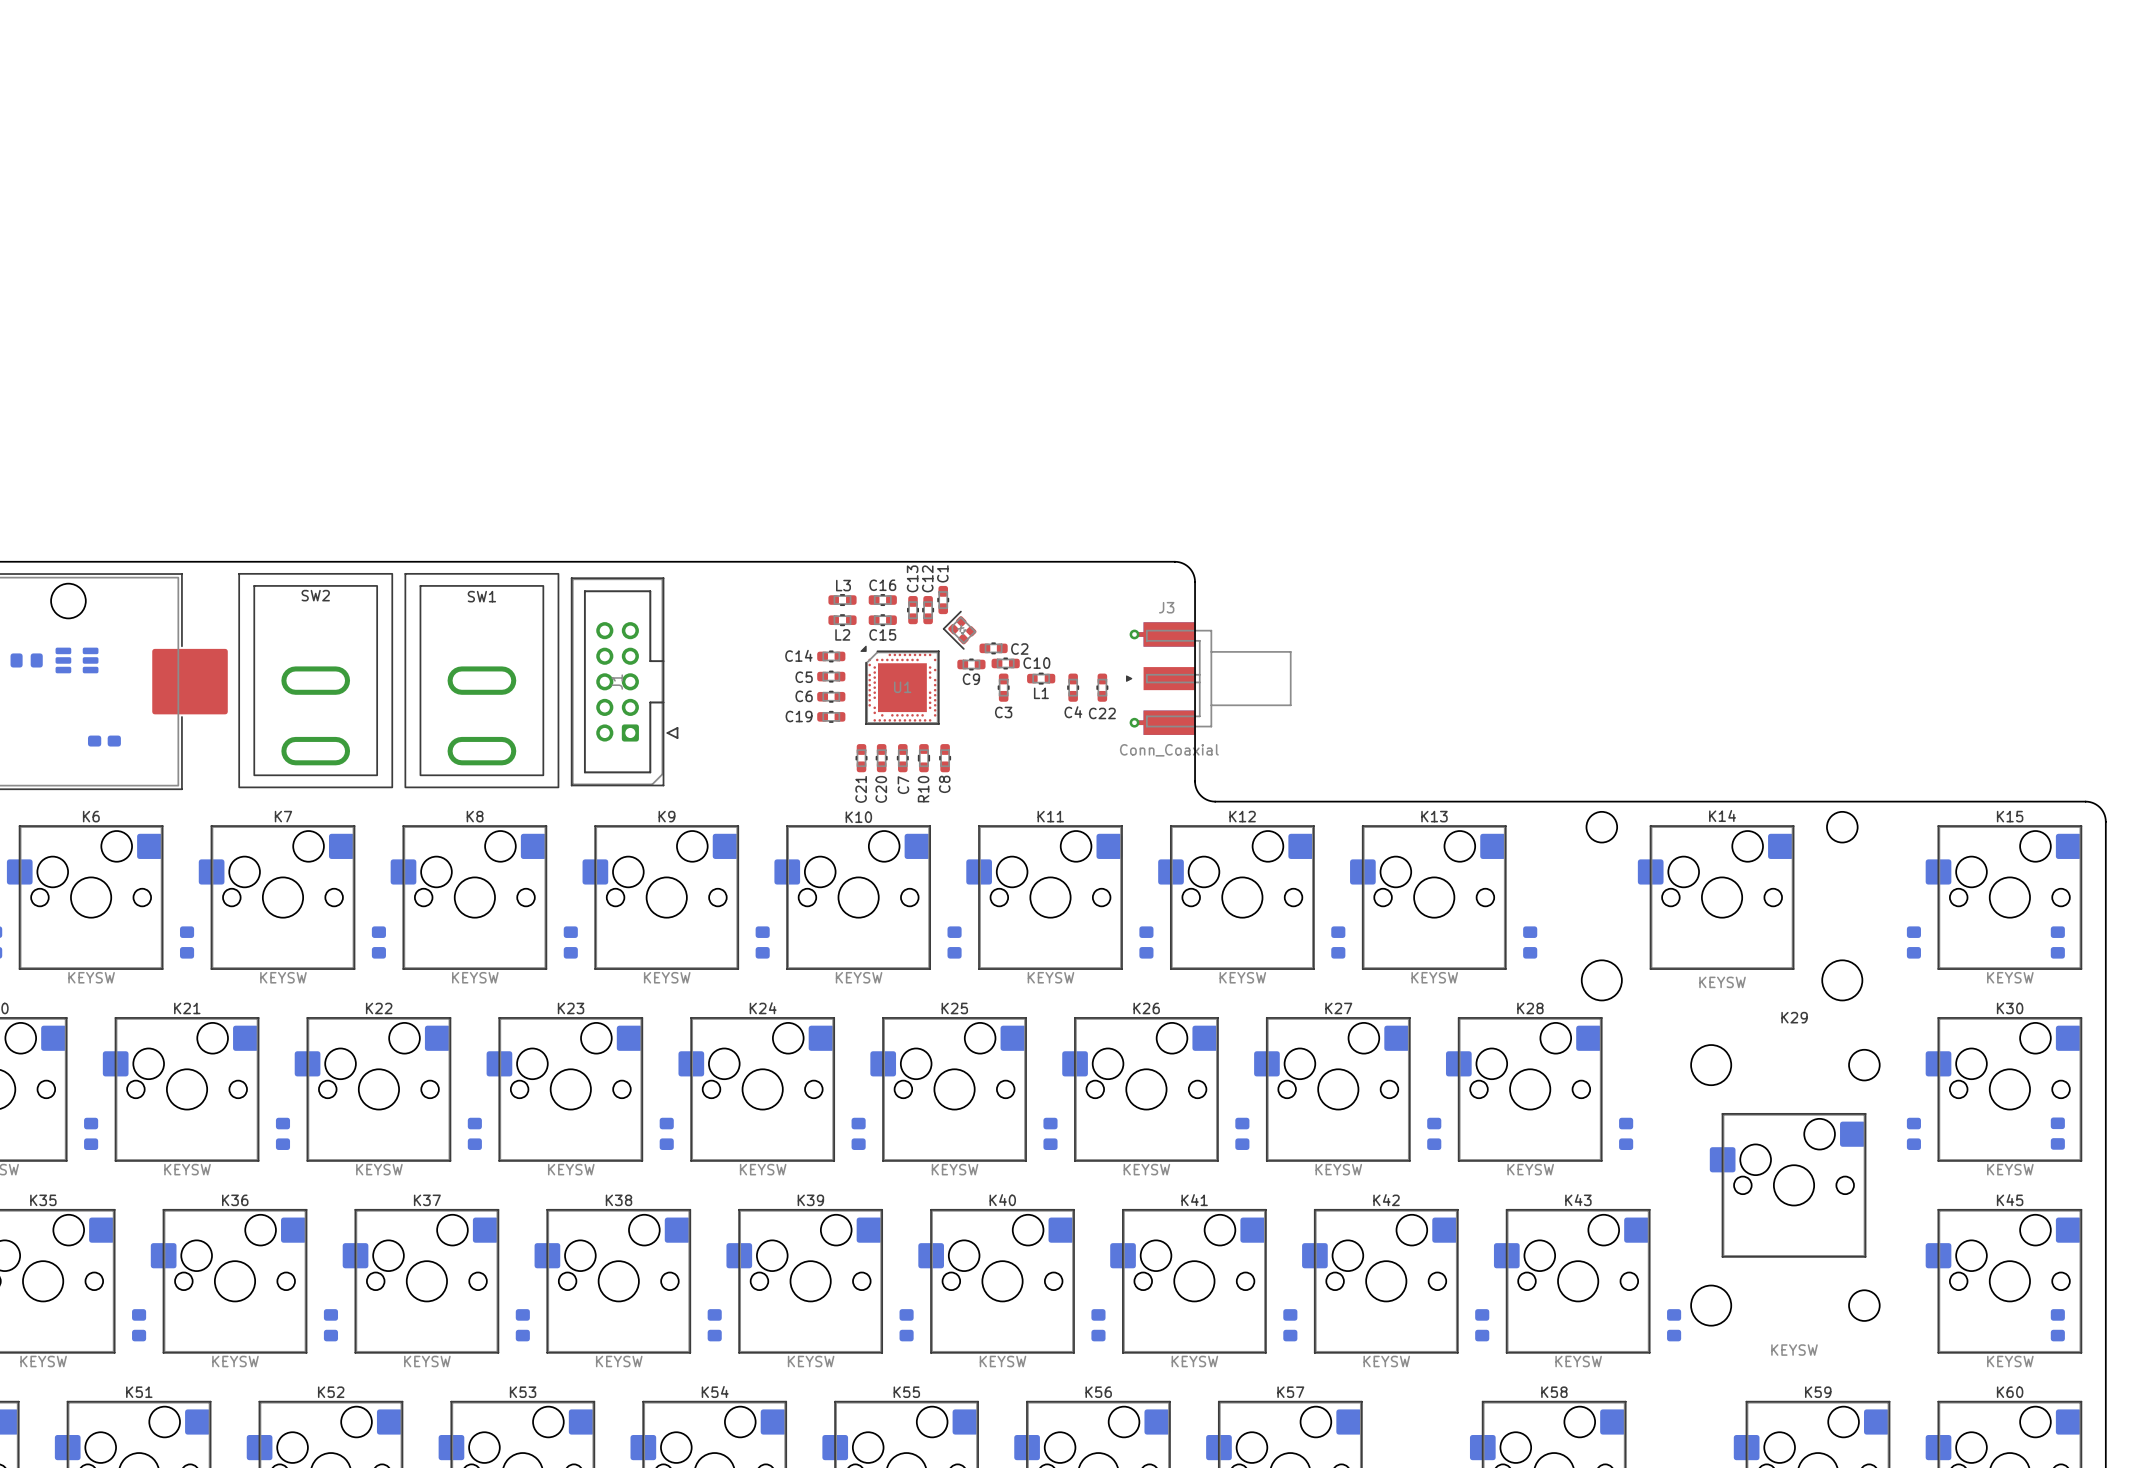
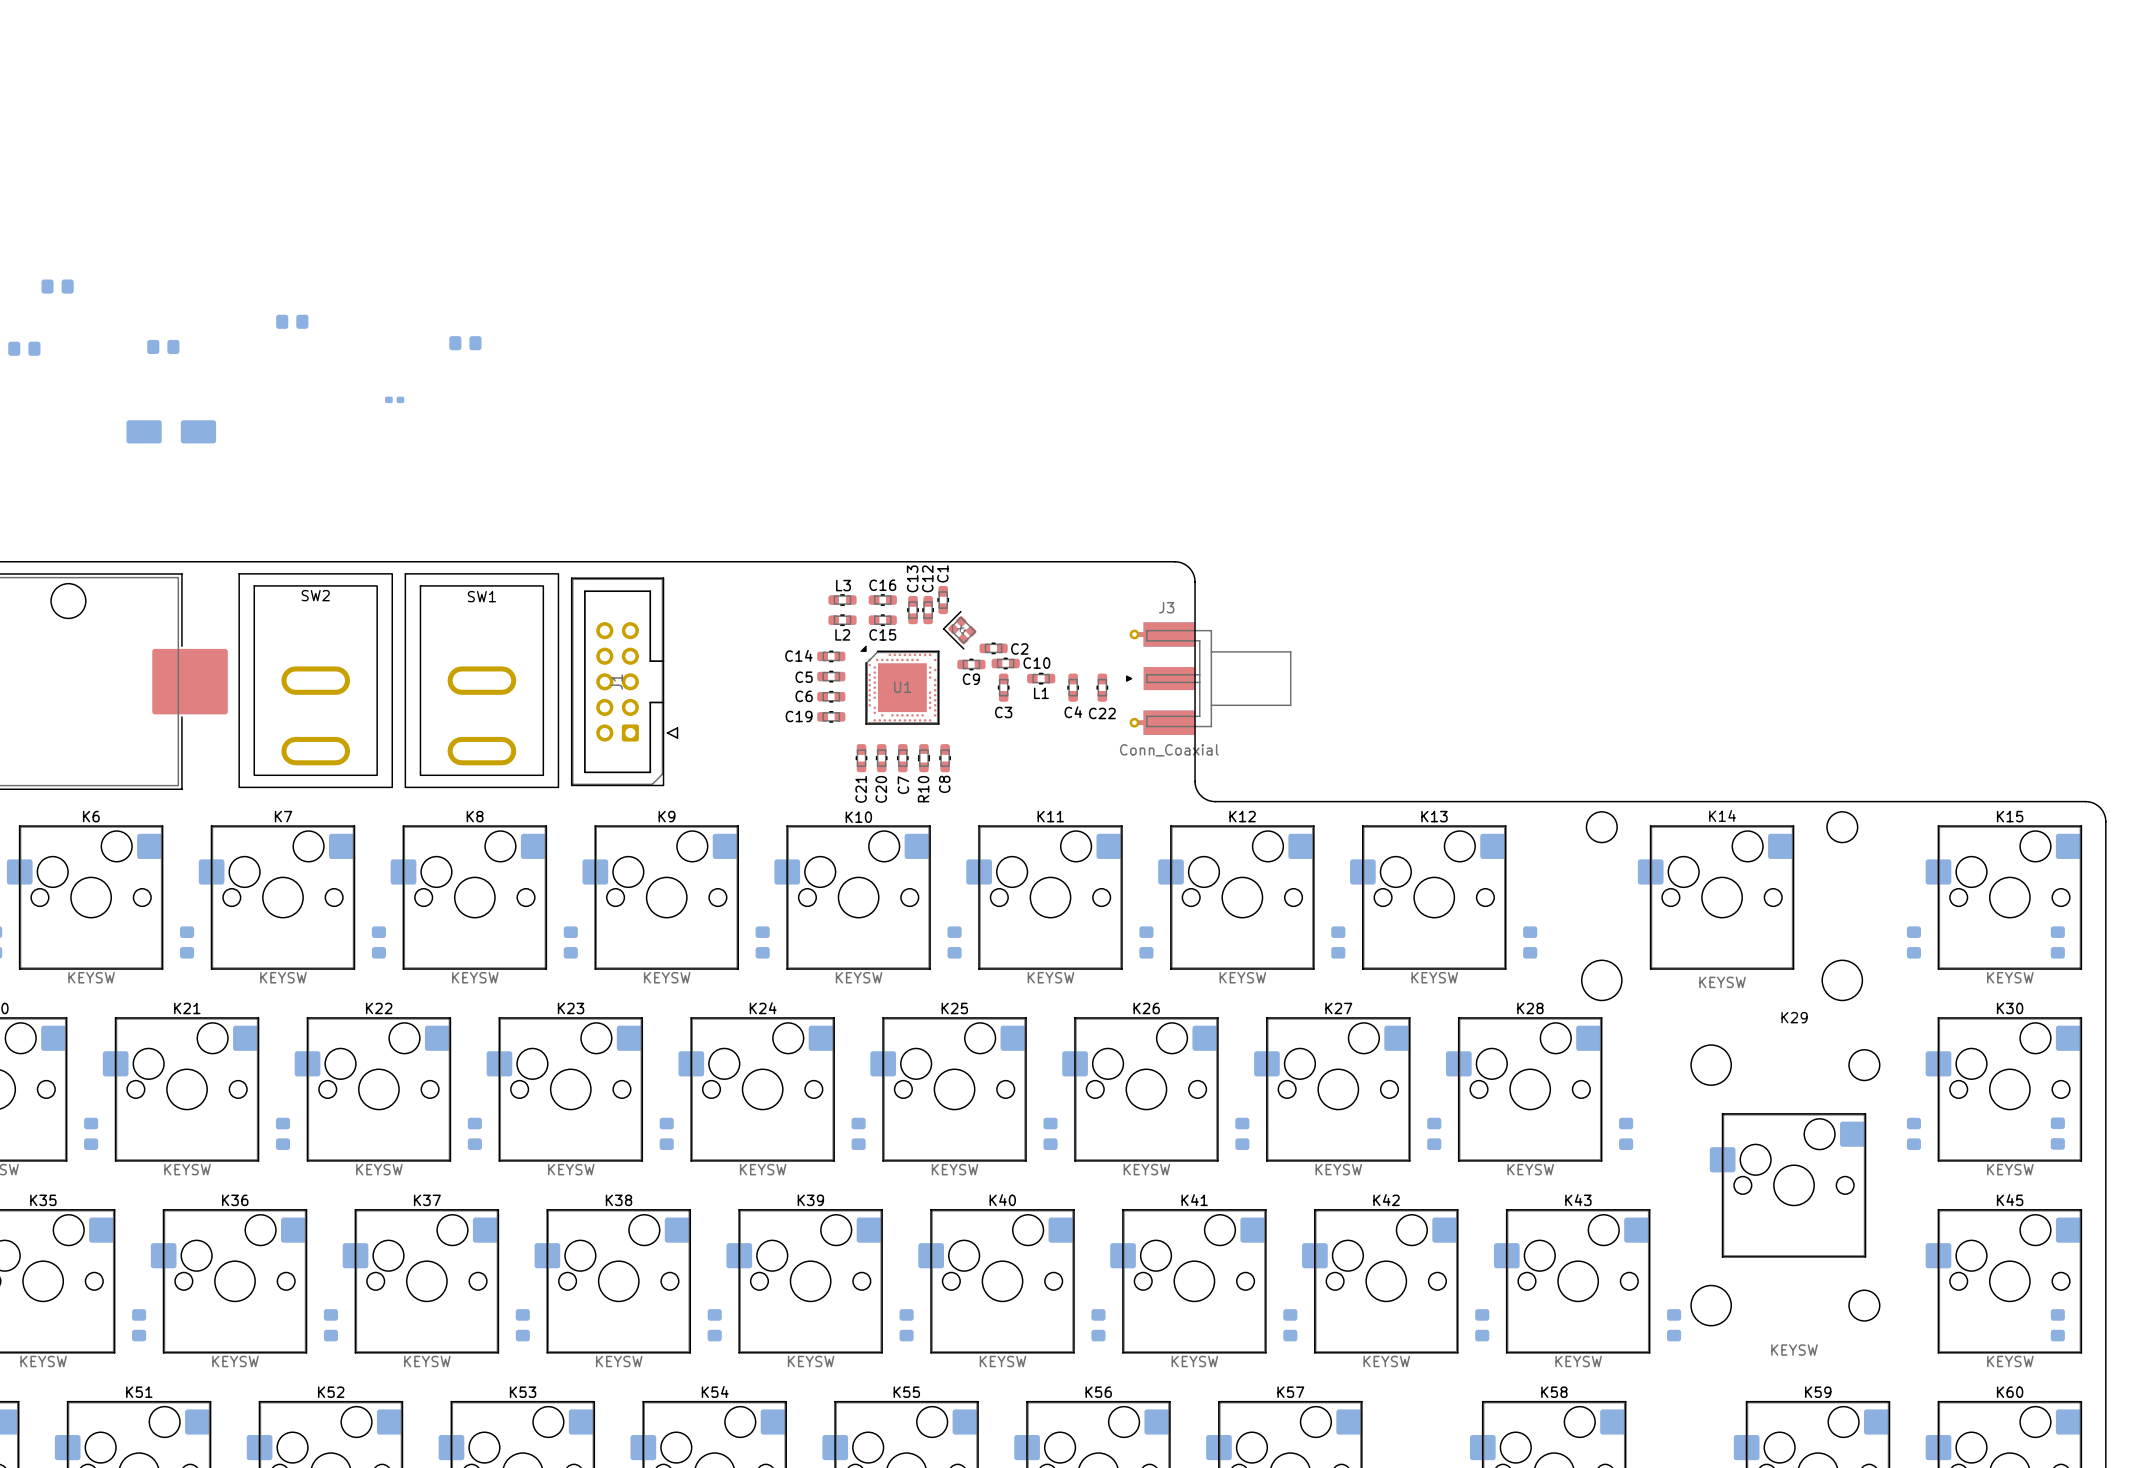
part: none -> (57, 286)
part: none -> (292, 321)
part: none -> (465, 343)
part: none -> (163, 346)
part: none -> (24, 348)
part: none -> (394, 399)
part: none -> (171, 431)
part: (26, 660) -> none
part: (77, 660) -> none
part: (104, 741) -> none

